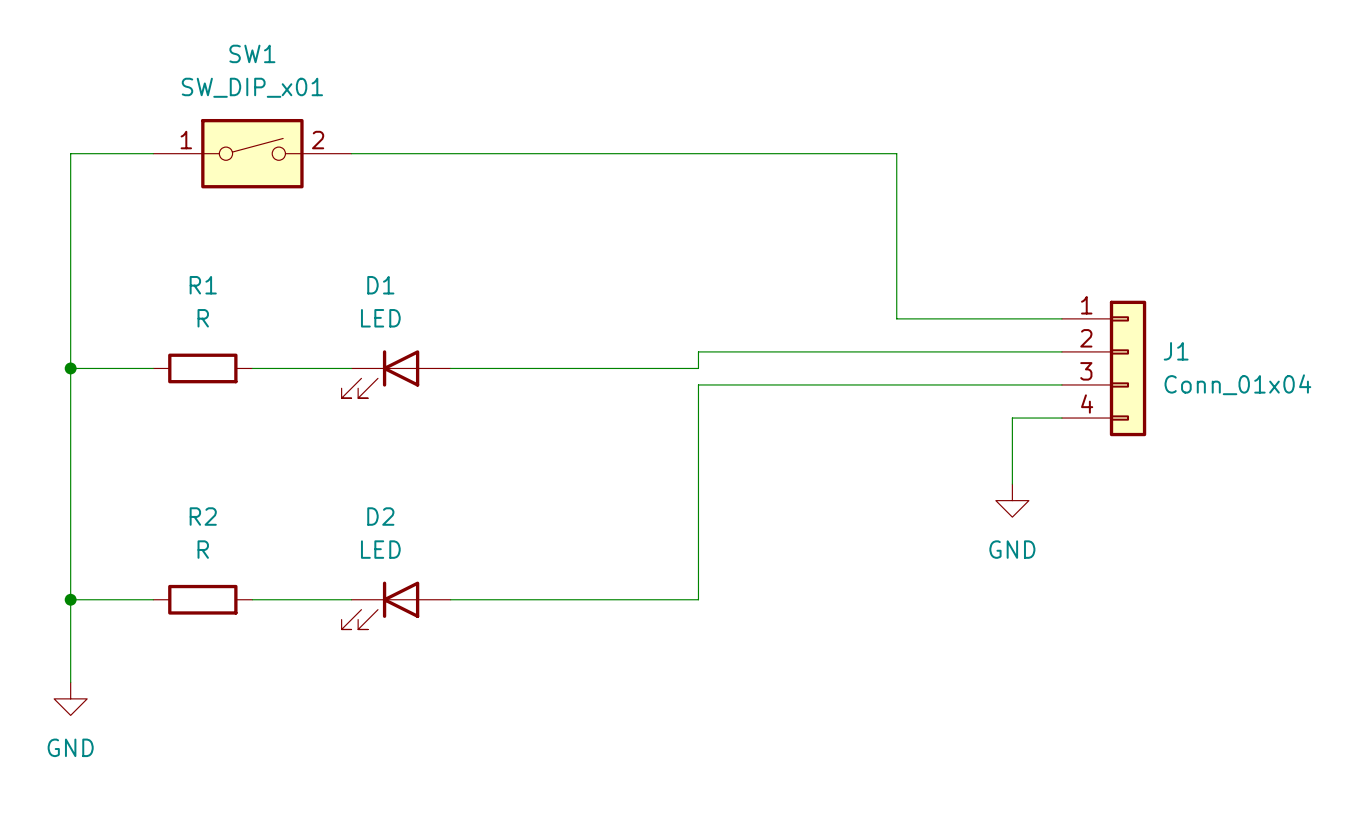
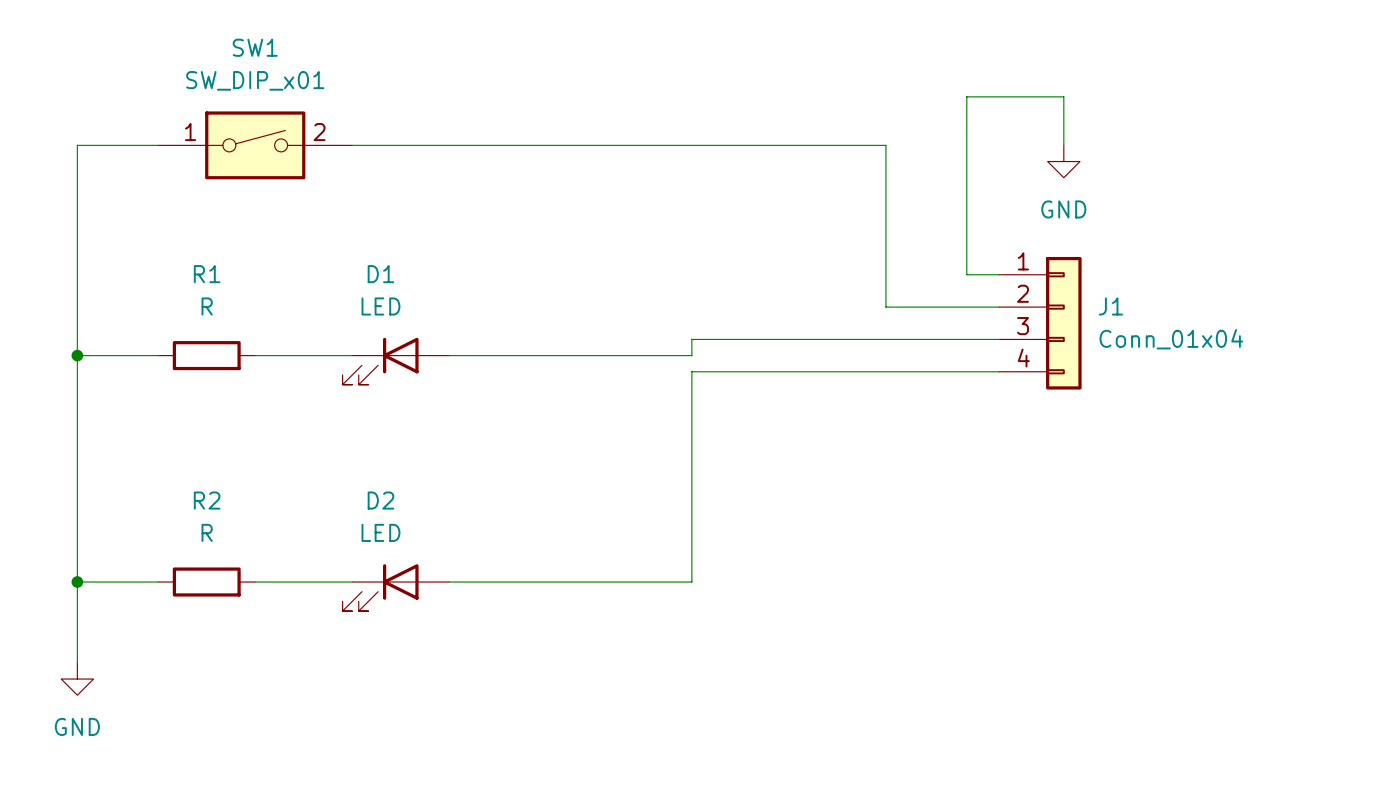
wire: none -> (1063, 145) (1063, 96) (966, 96) (966, 274) (999, 274)
power symbol: none -> GND (1063, 161)
J1 position: (1104, 368) -> (1040, 323)
wire: (1061, 418) (1012, 418) (1012, 484) -> none
power symbol: GND (1012, 500) -> none

